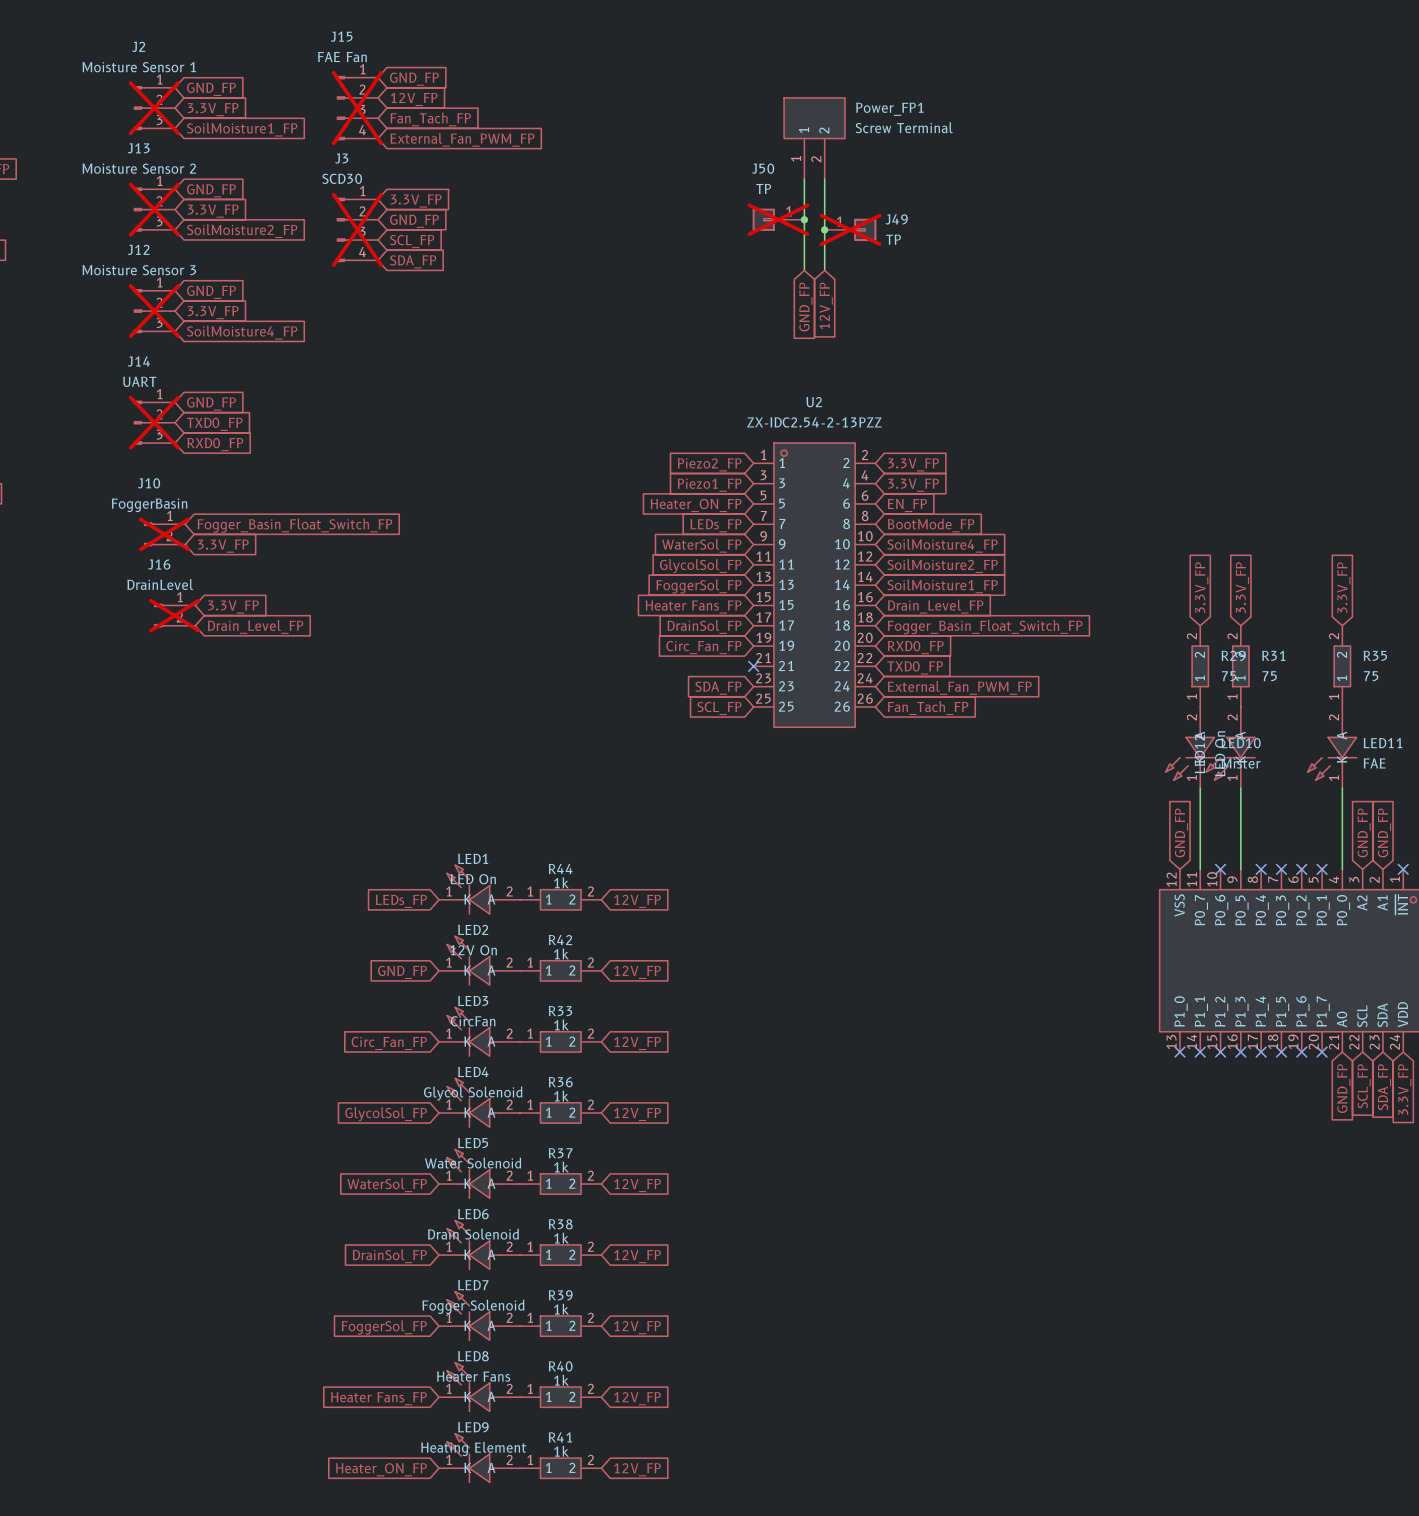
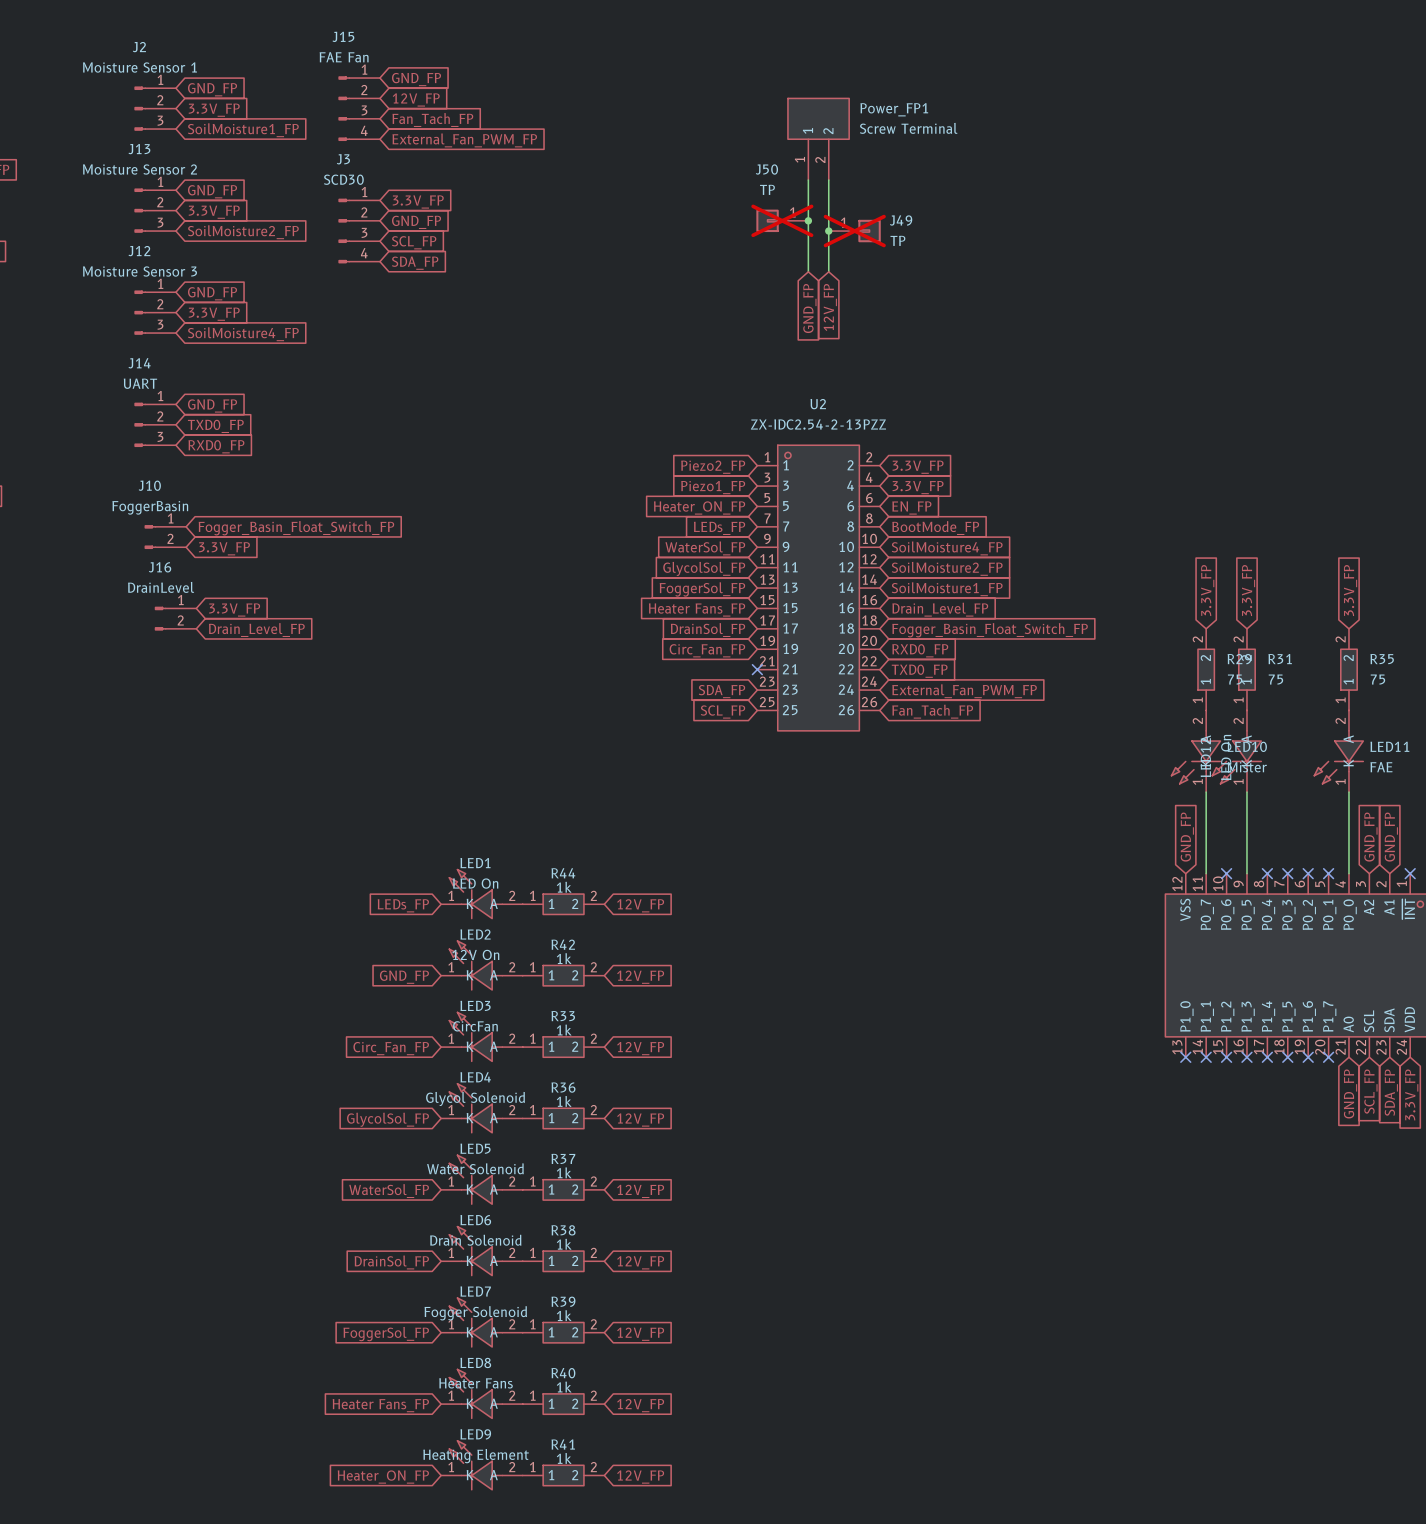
J2 do-not-place cross: (154, 108) -> none
J15 do-not-place cross: (357, 108) -> none
J13 do-not-place cross: (154, 209) -> none
J3 do-not-place cross: (357, 229) -> none
J12 do-not-place cross: (154, 311) -> none
J14 do-not-place cross: (154, 422) -> none
J10 do-not-place cross: (164, 534) -> none
J16 do-not-place cross: (174, 615) -> none

